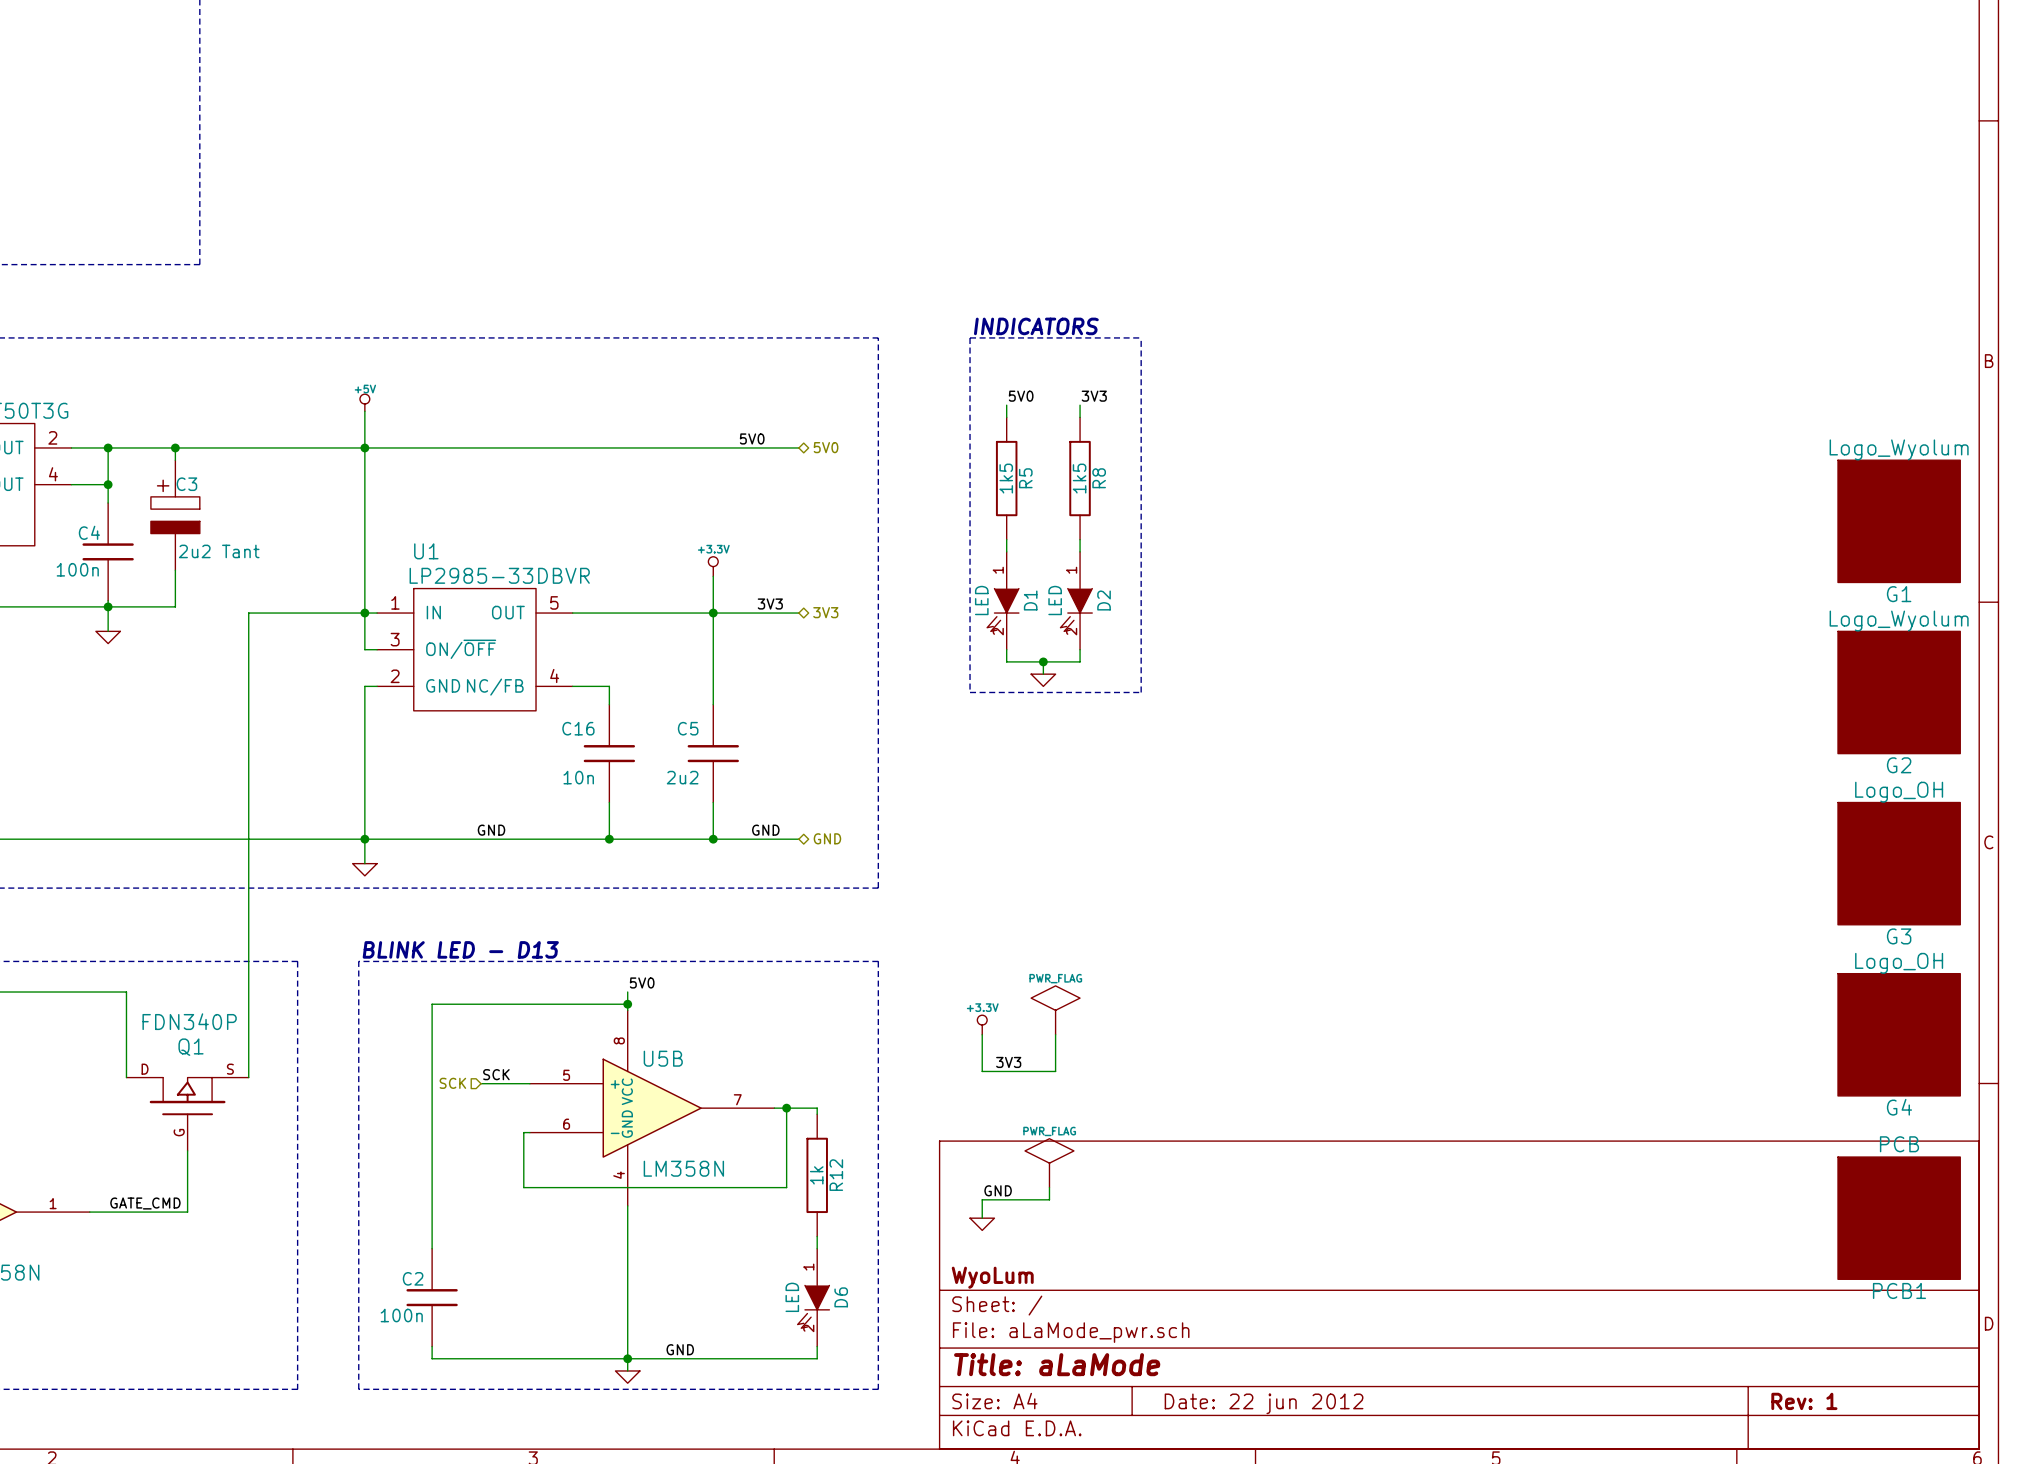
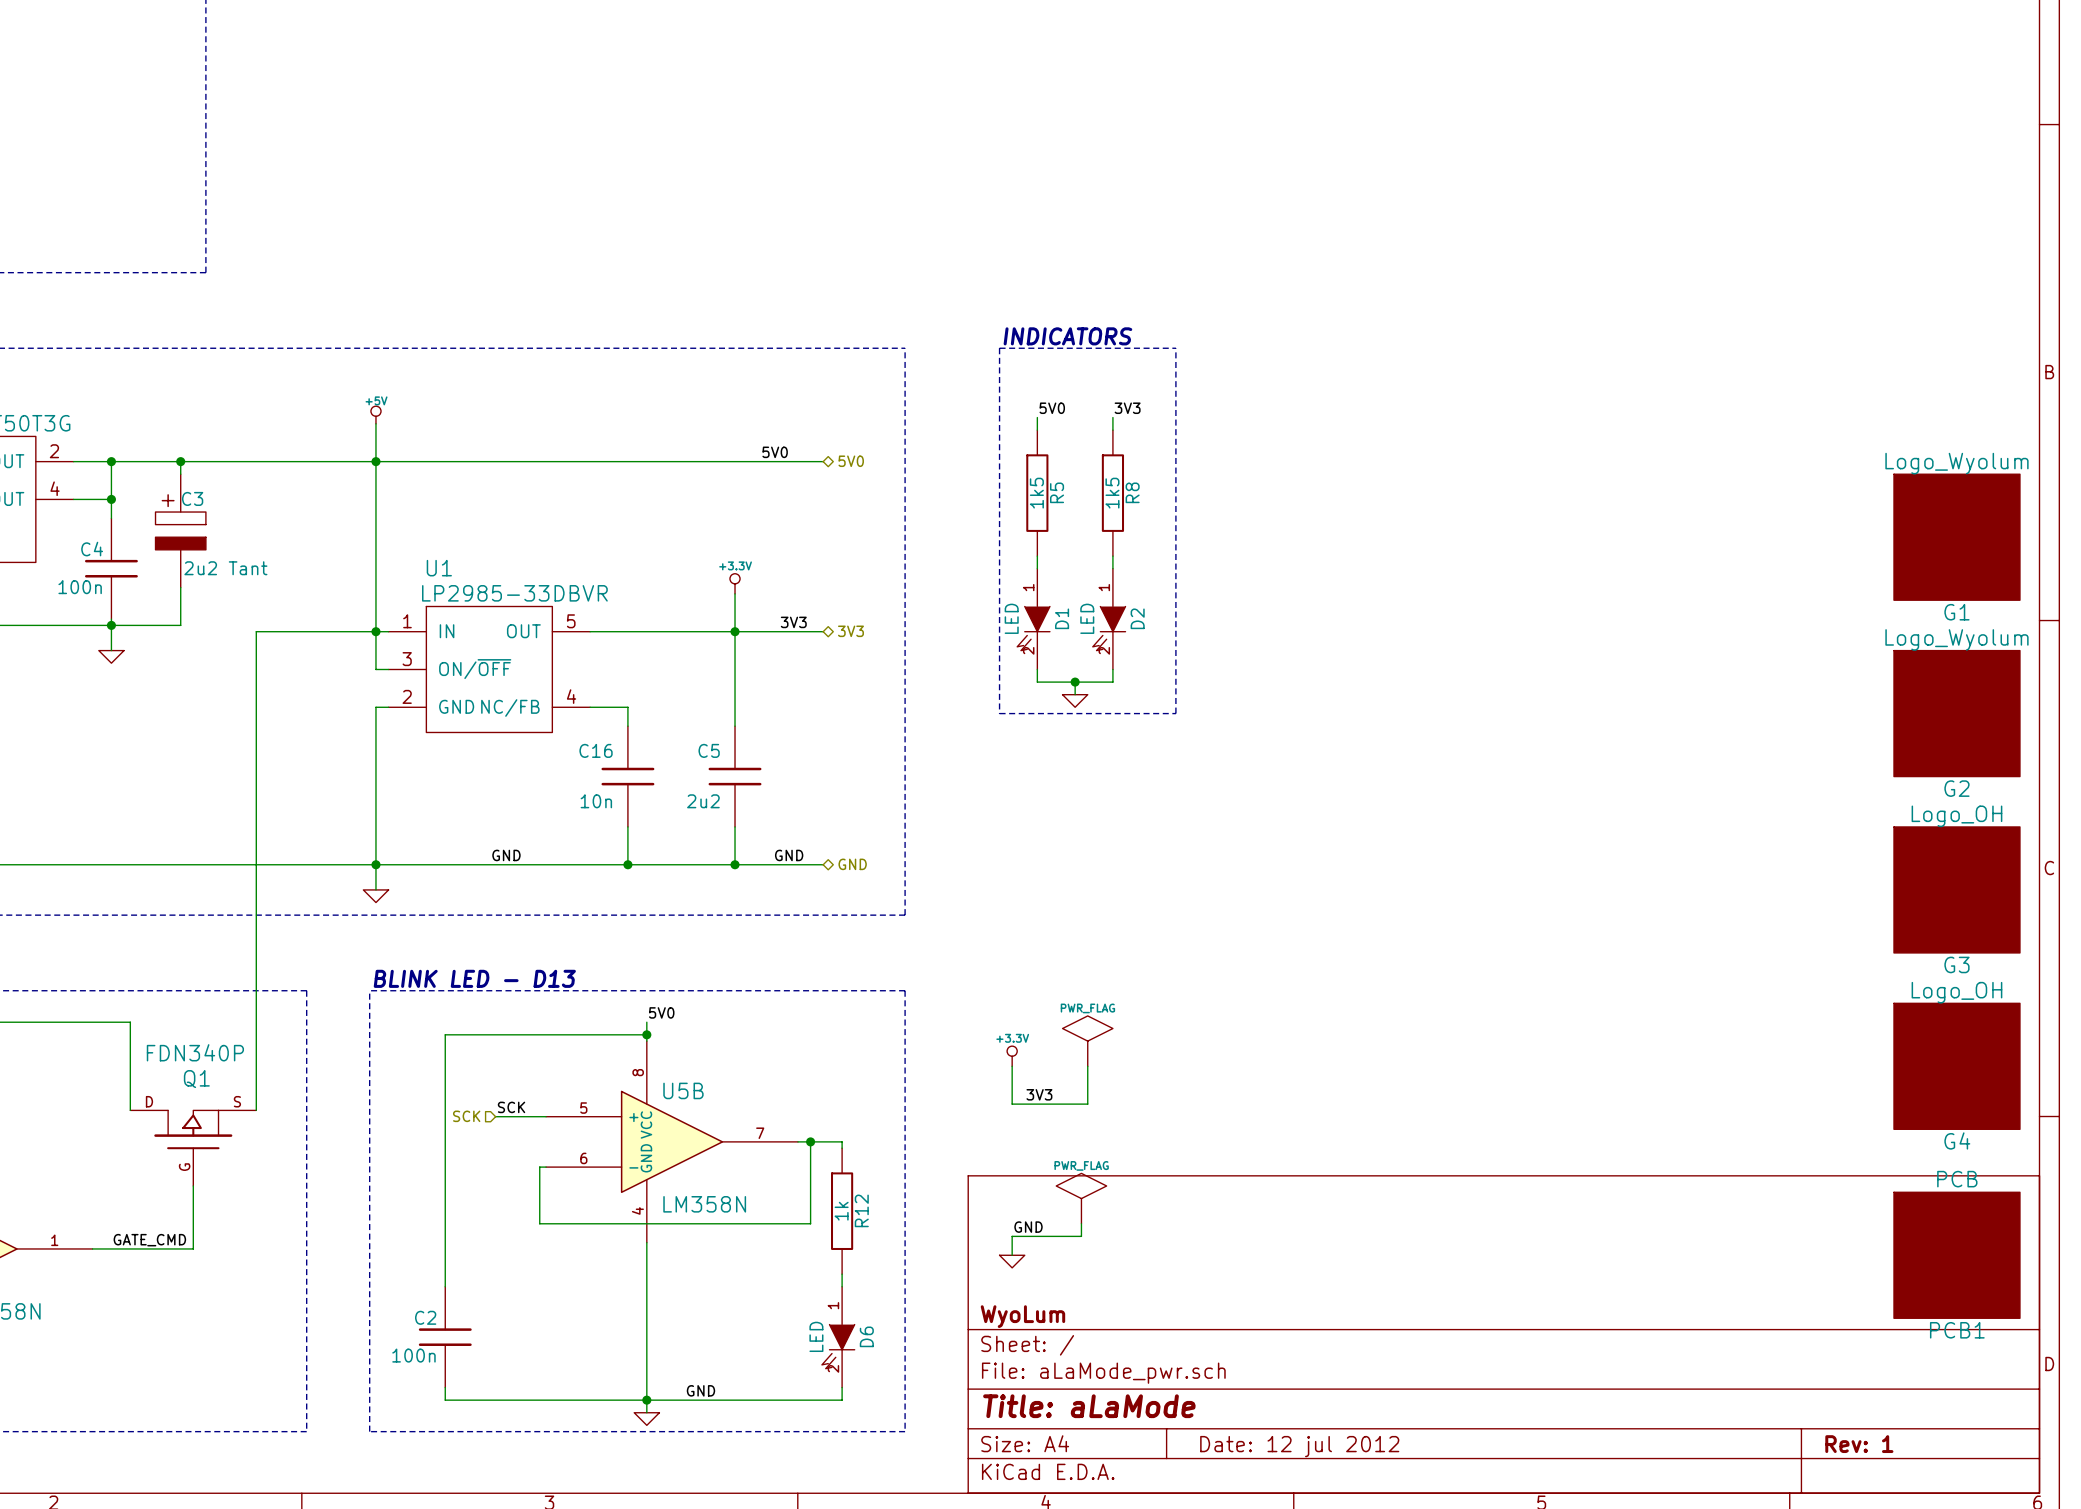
title block: Date: 22 jun 2012 (1264, 1403) -> Date: 12 jul 2012 (1299, 1446)

